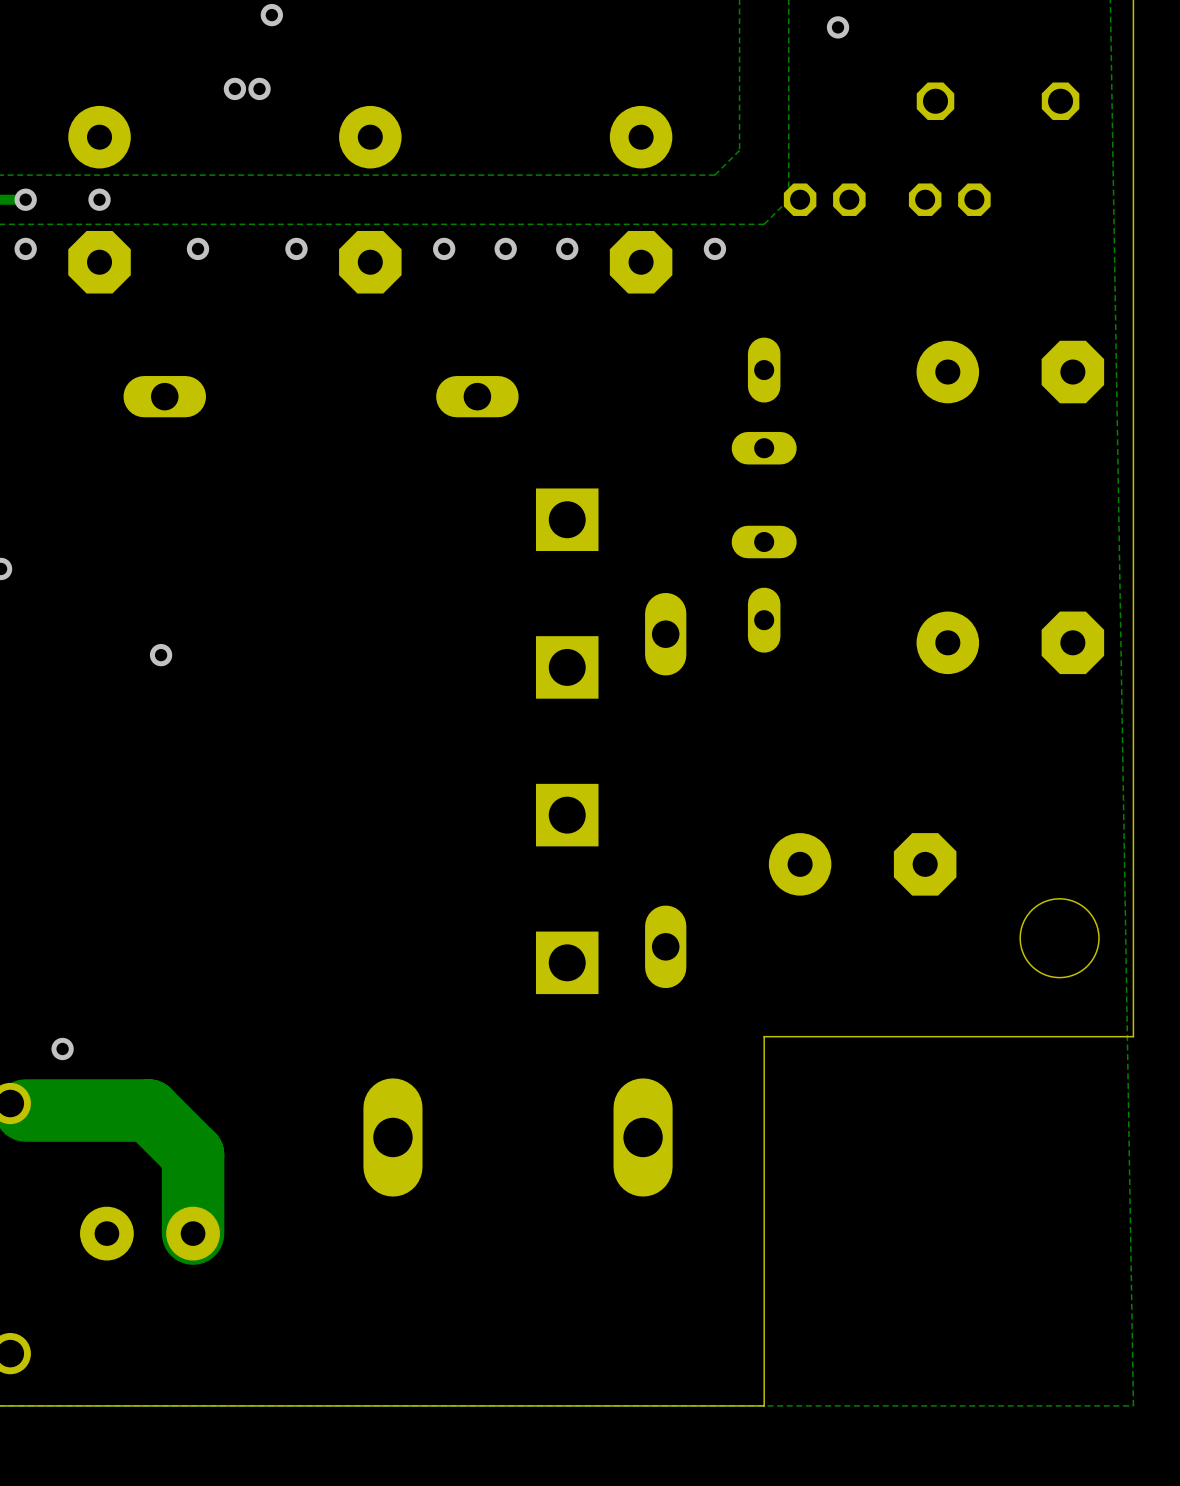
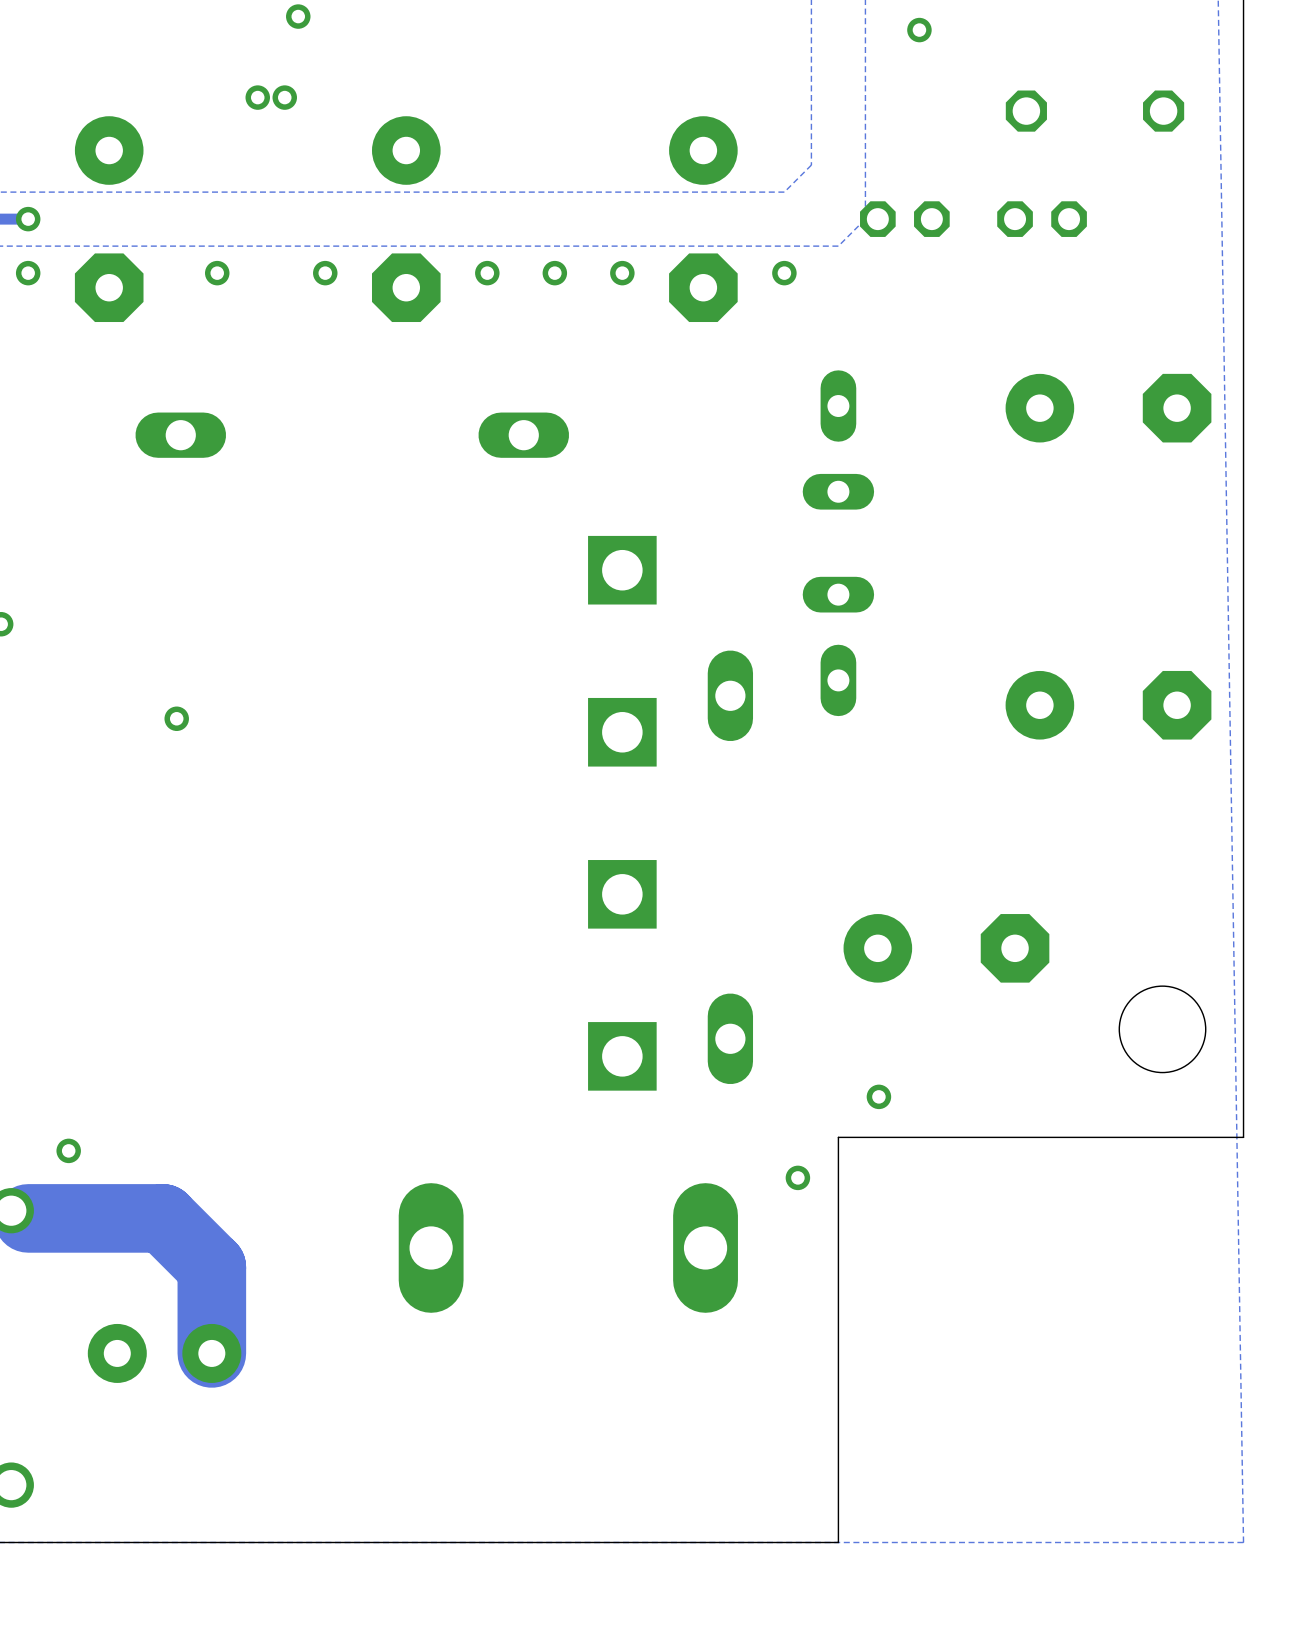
via: (99, 199) -> none
via: none -> (878, 1096)
via: none -> (797, 1177)

